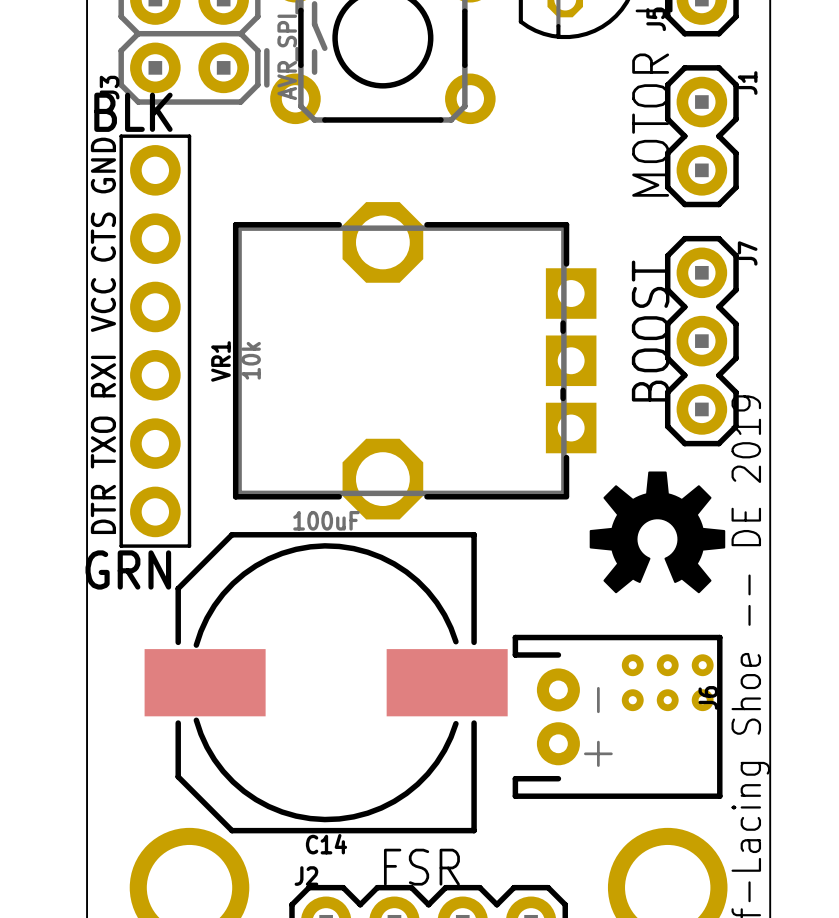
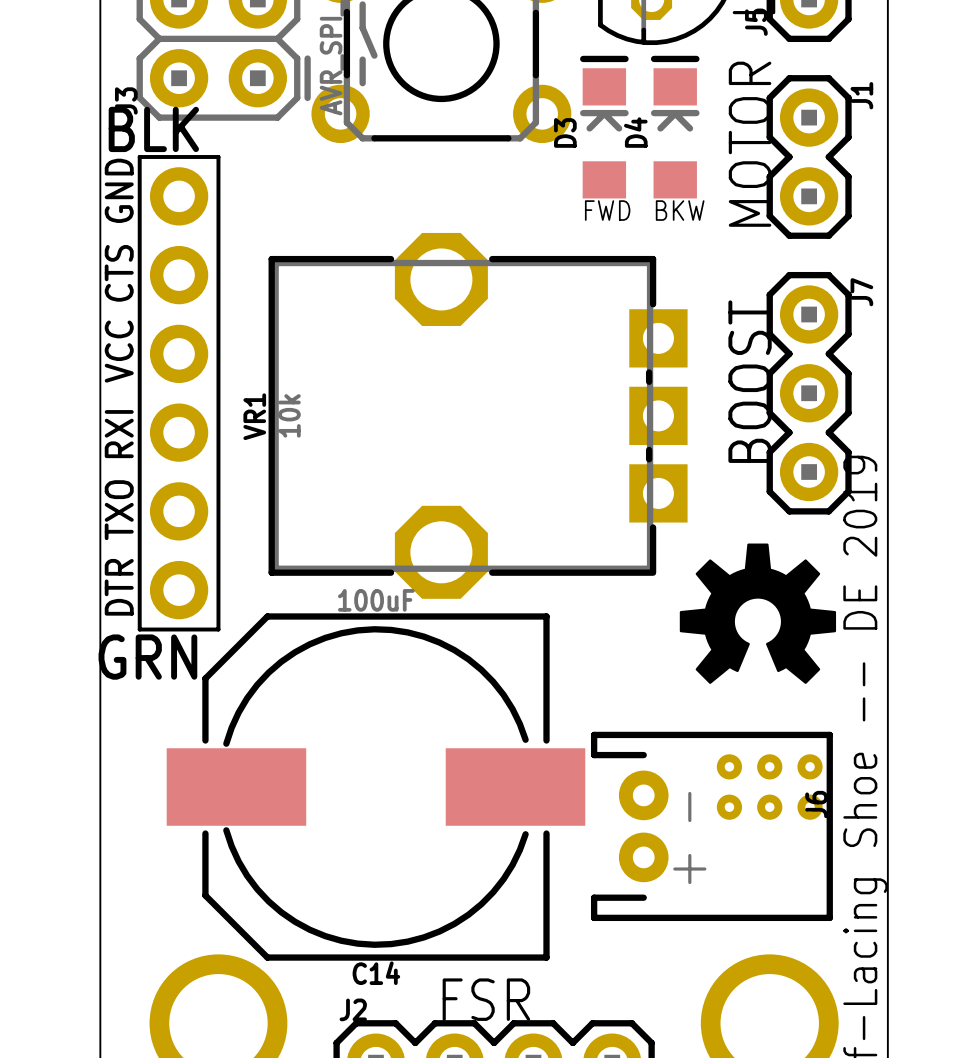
D3: none -> (604, 127)
D4: none -> (675, 127)
text: none -> FWD (607, 210)
text: none -> BKW (680, 210)

